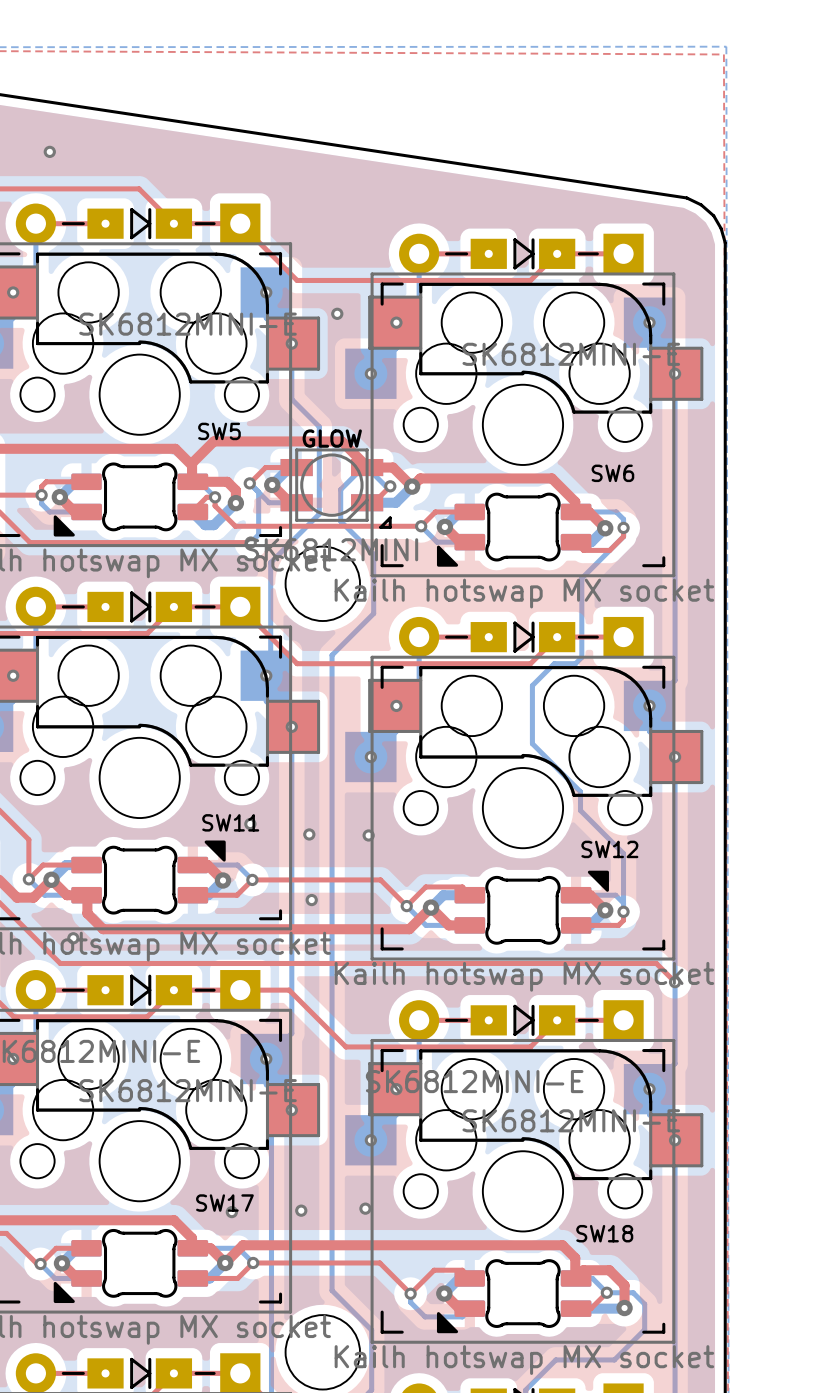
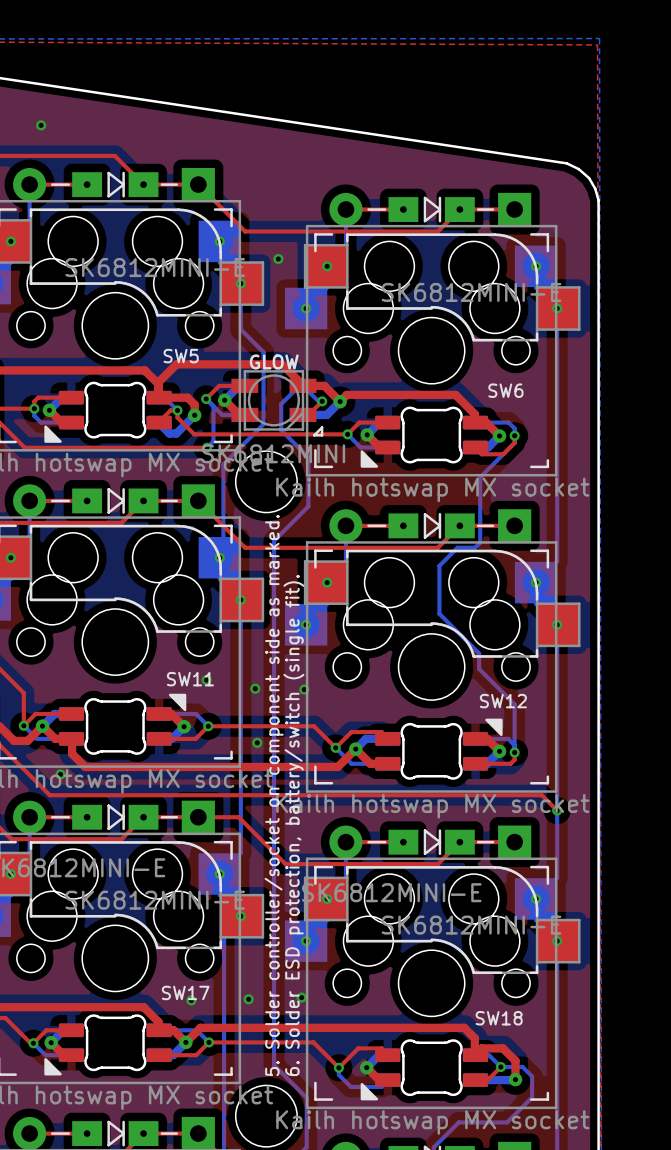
text: none -> 5. Solder controller/socket on component side as marked. (274, 795)
text: none -> 6. Solder ESD protection, battery/switch (single fit). (293, 825)

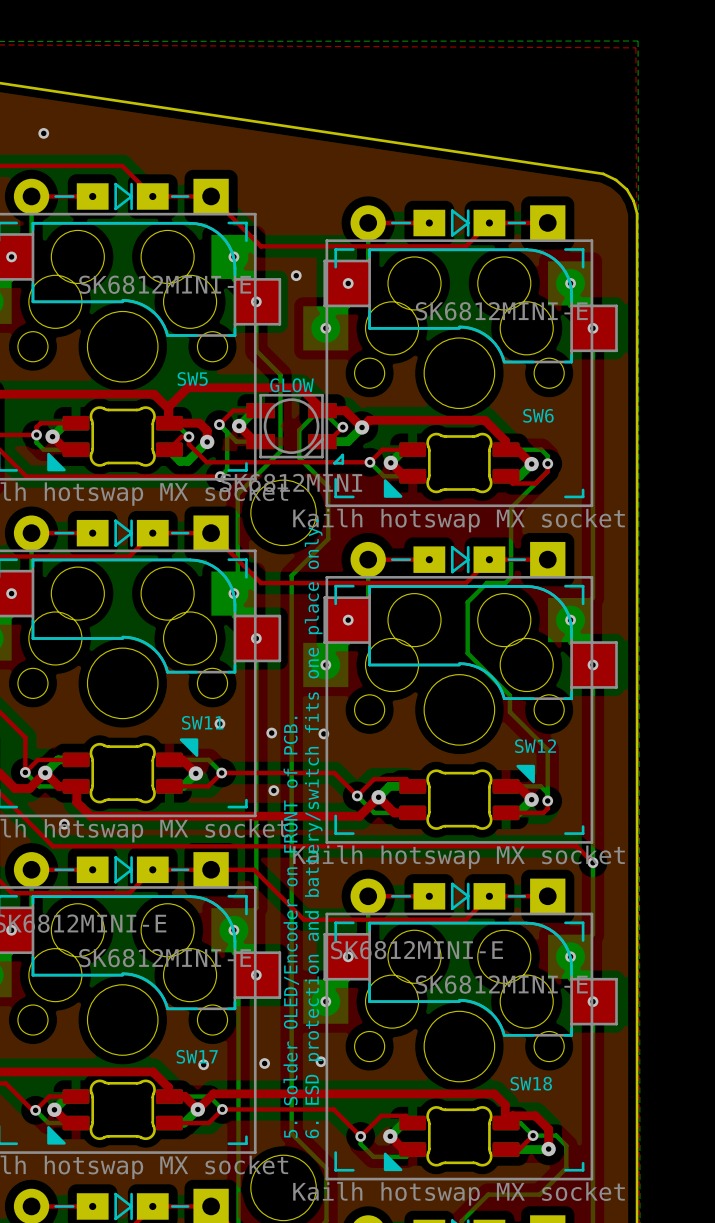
text: 5. Solder controller/socket on component side as marked. (274, 795) -> 5. Solder OLED/Encoder on FRONT of PCB. (291, 927)
text: 6. Solder ESD protection, battery/switch (single fit). (293, 825) -> 6. ESD protection and battery/switch fits one place only. (313, 828)

